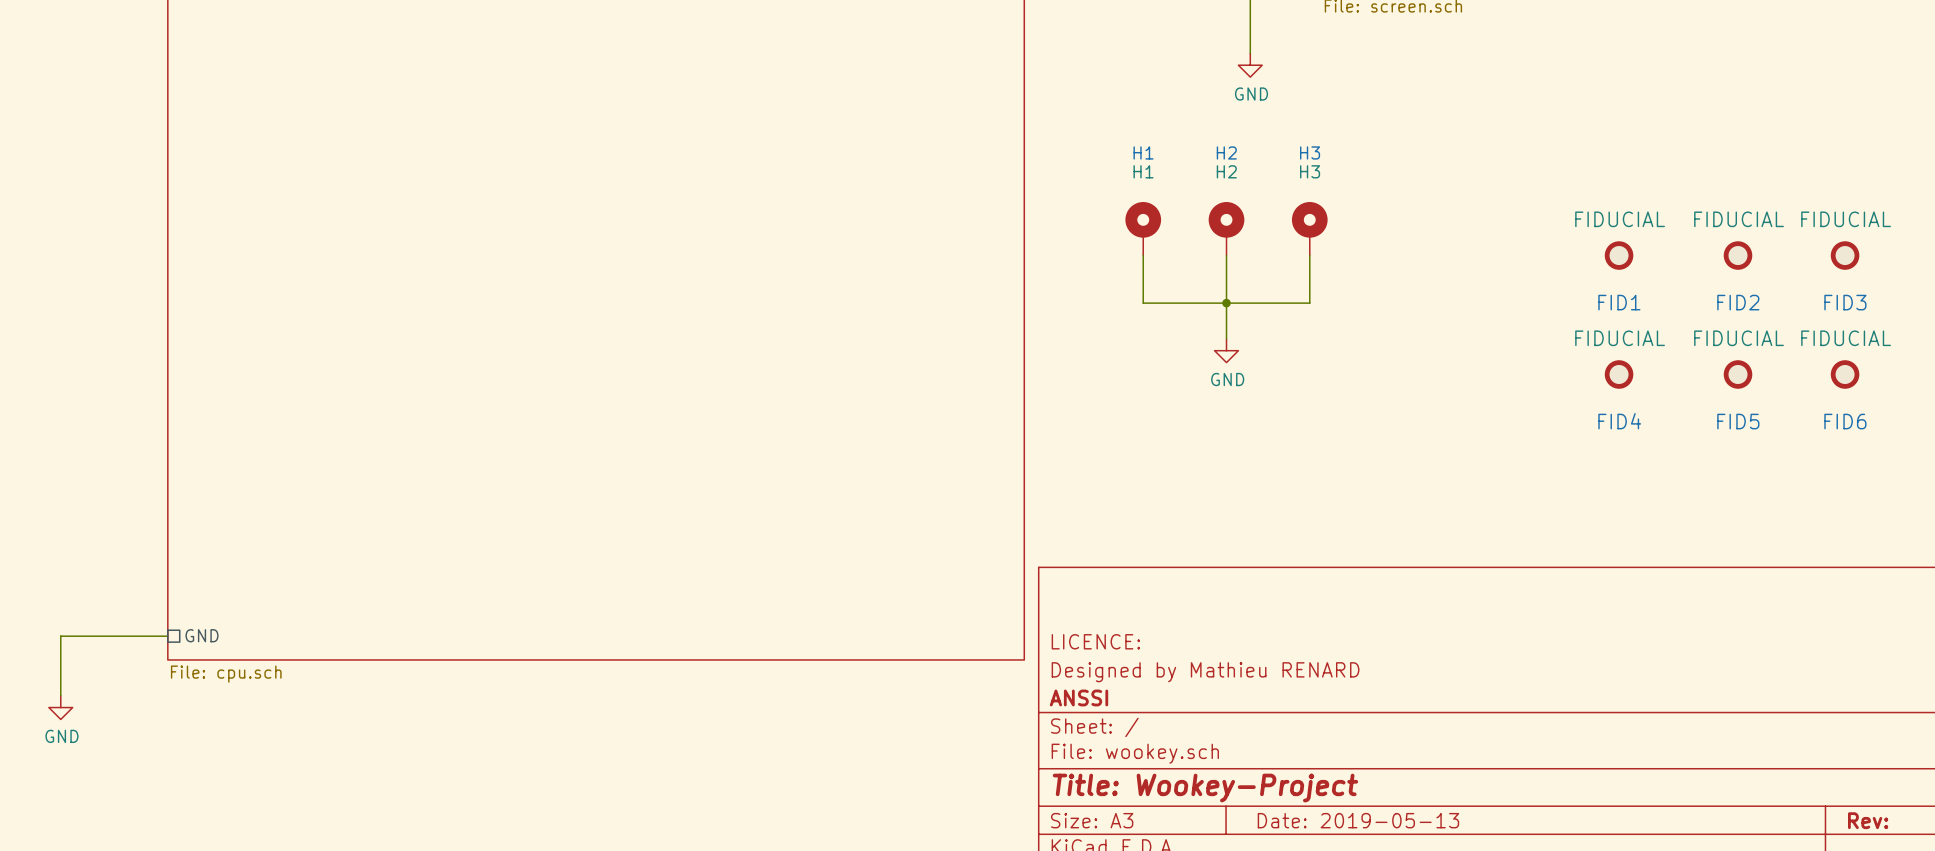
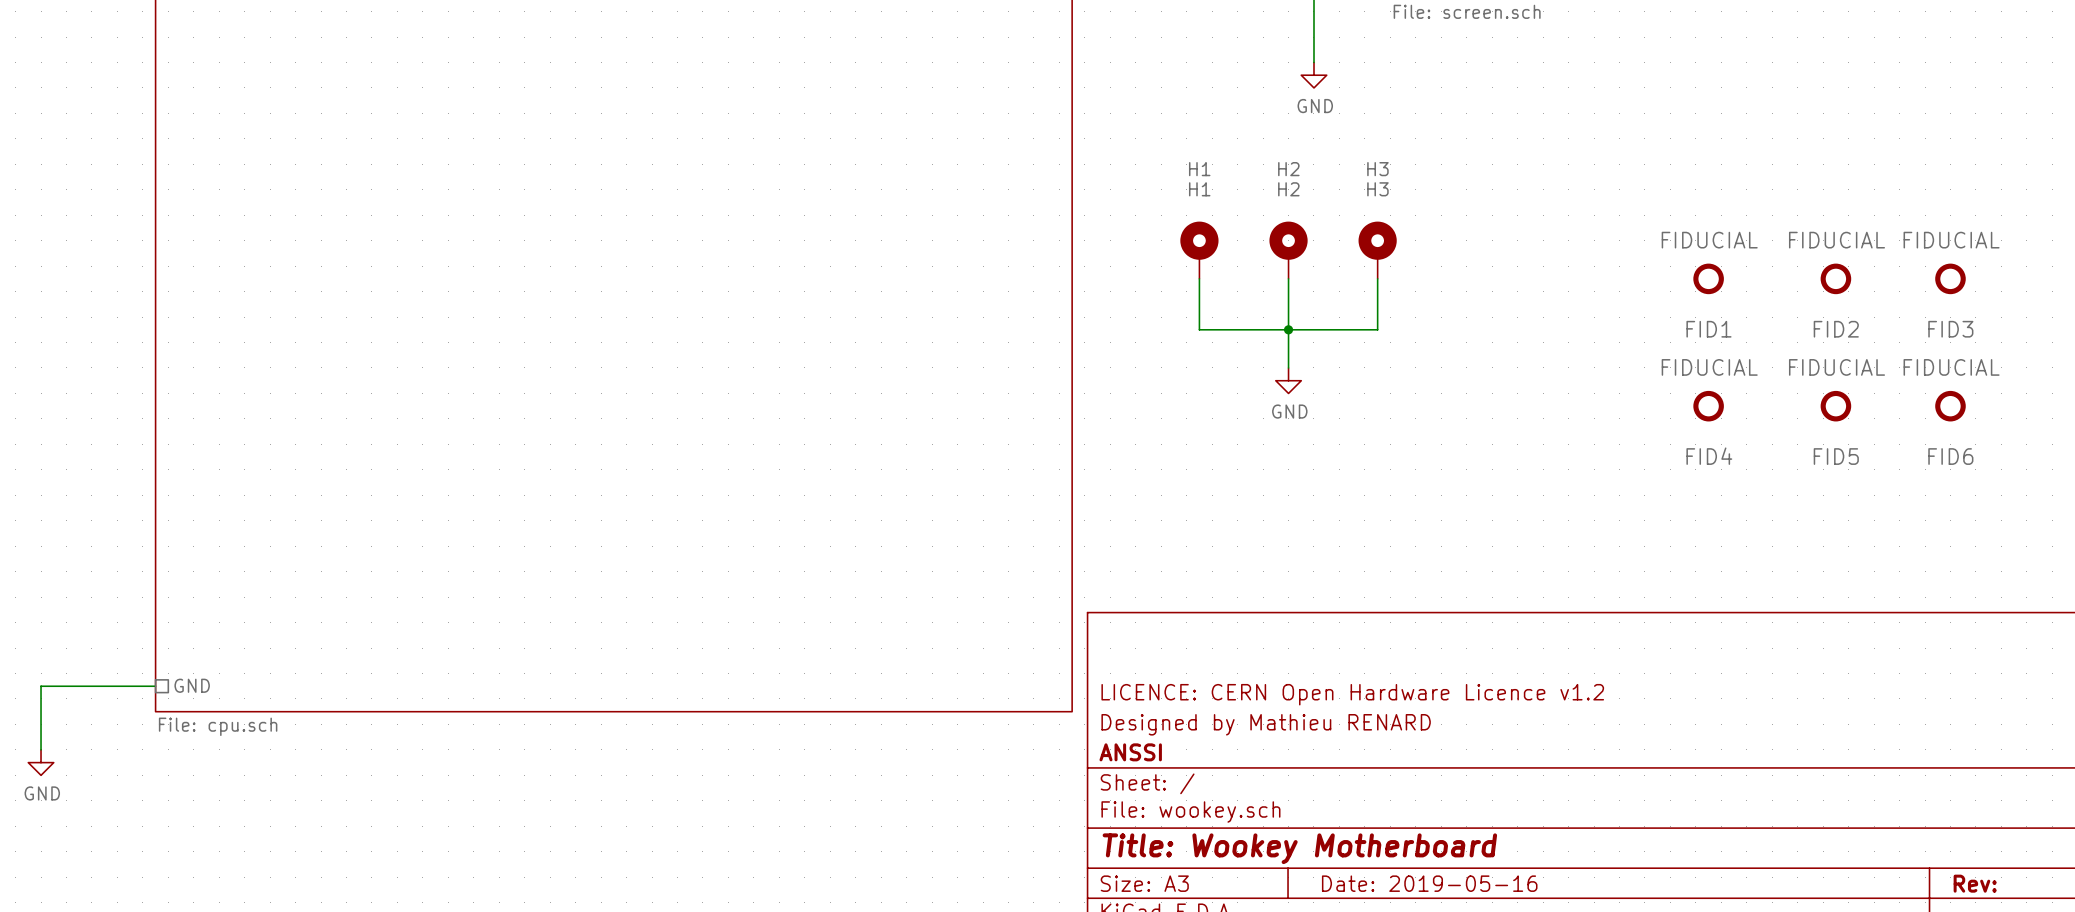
title block: LICENCE: (1095, 641) -> LICENCE: CERN Open Hardware Licence v1.2 (1352, 694)
title block: Title: Wookey-Project (1205, 788) -> Title: Wookey Motherboard (1299, 848)
title block: Date: 2019-05-13 (1358, 820) -> Date: 2019-05-16 (1429, 883)

